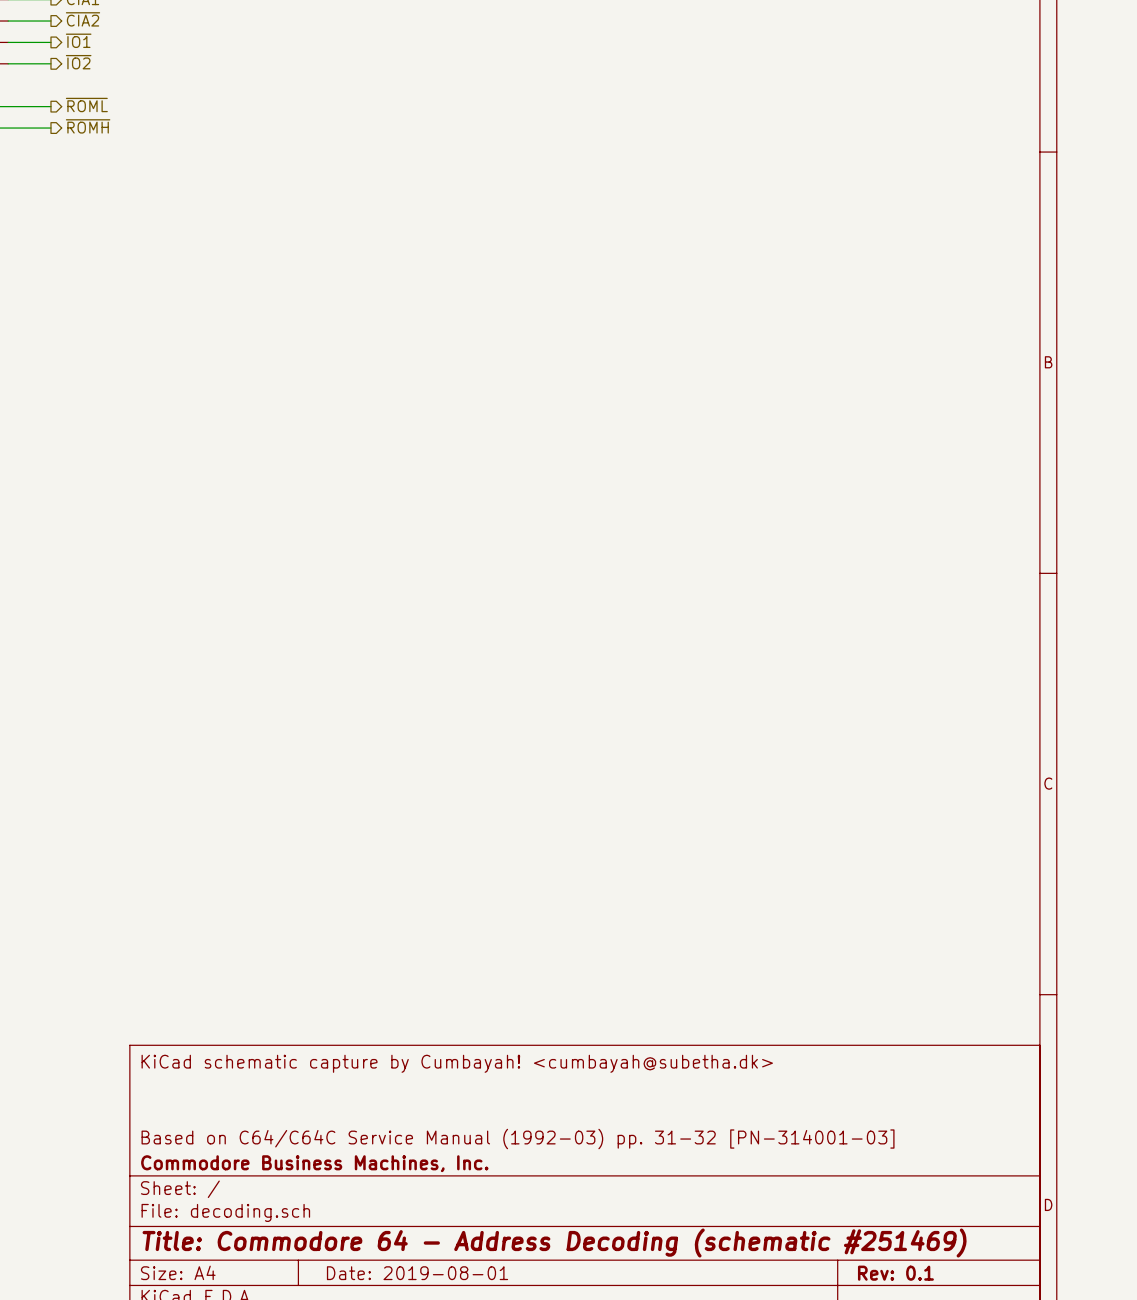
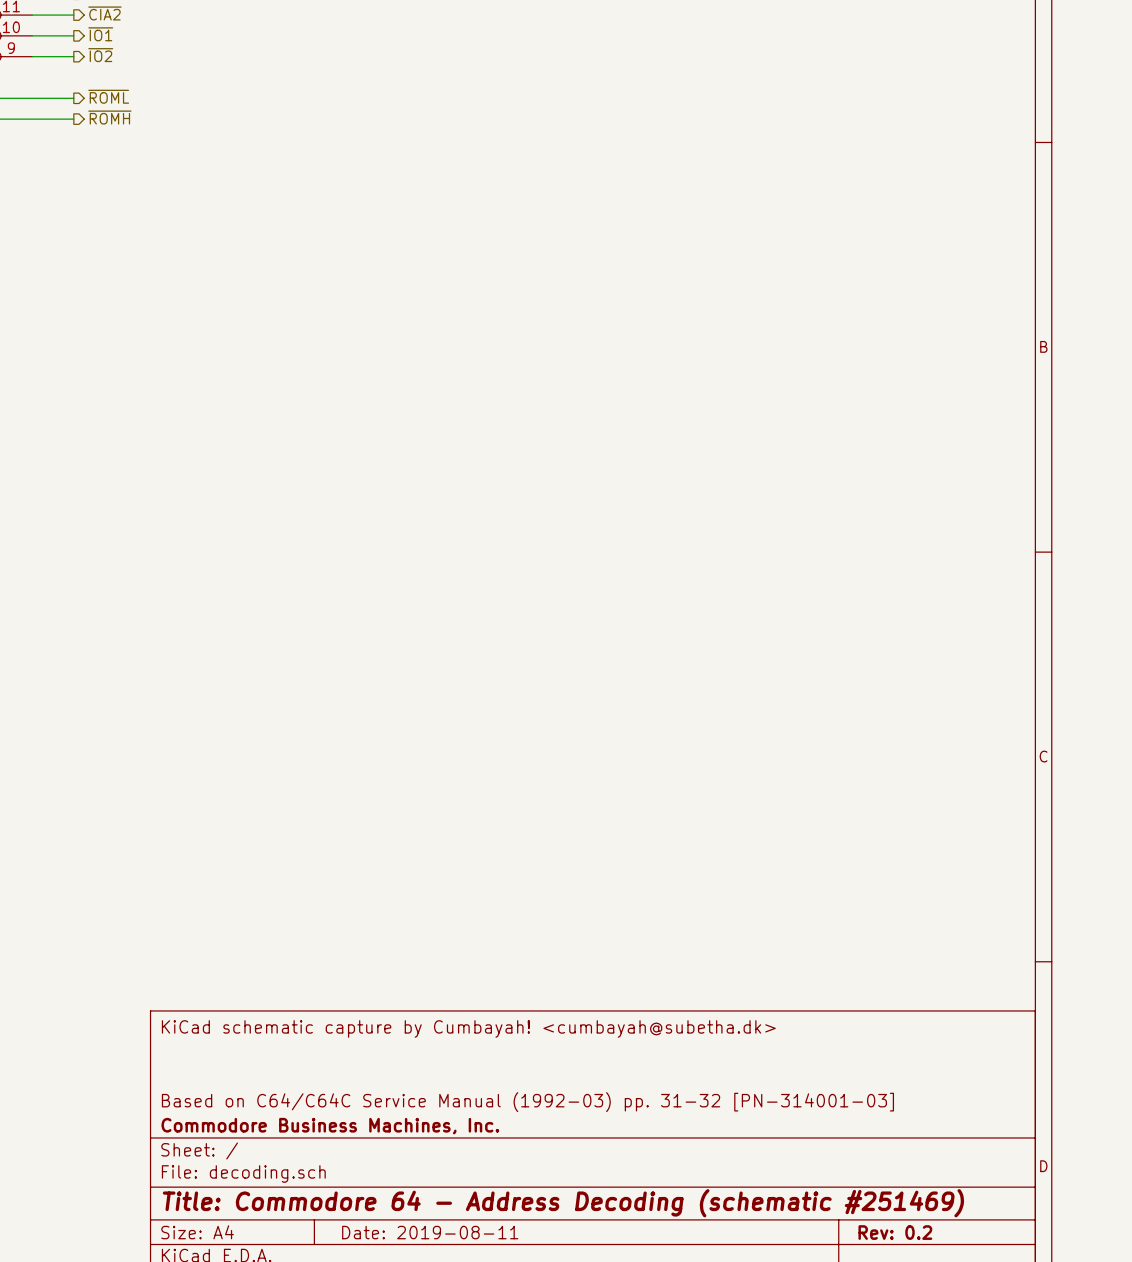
title block: Date: 2019-08-01 (417, 1273) -> Date: 2019-08-11 (430, 1232)
title block: Rev: 0.1 (895, 1273) -> Rev: 0.2 (895, 1232)

